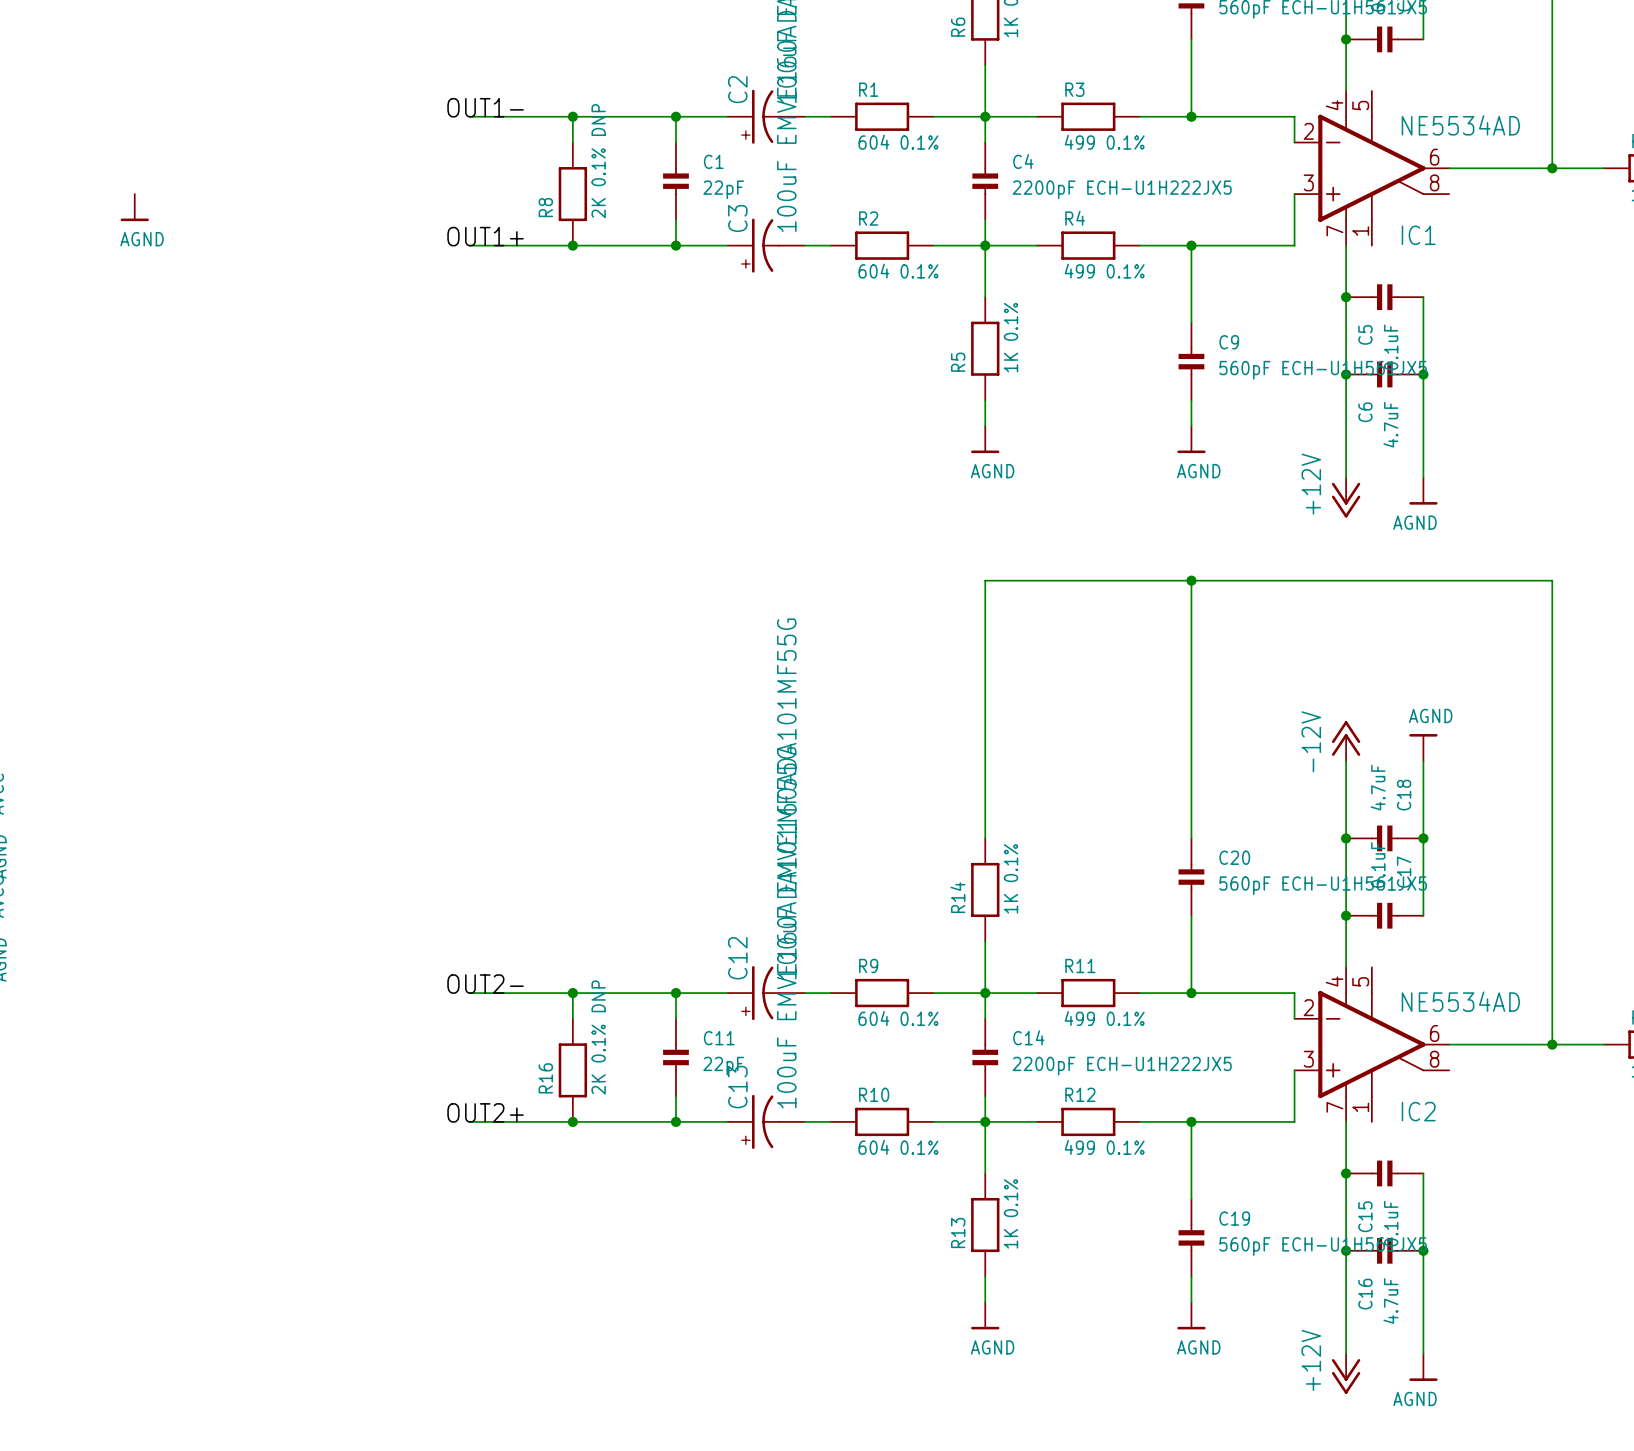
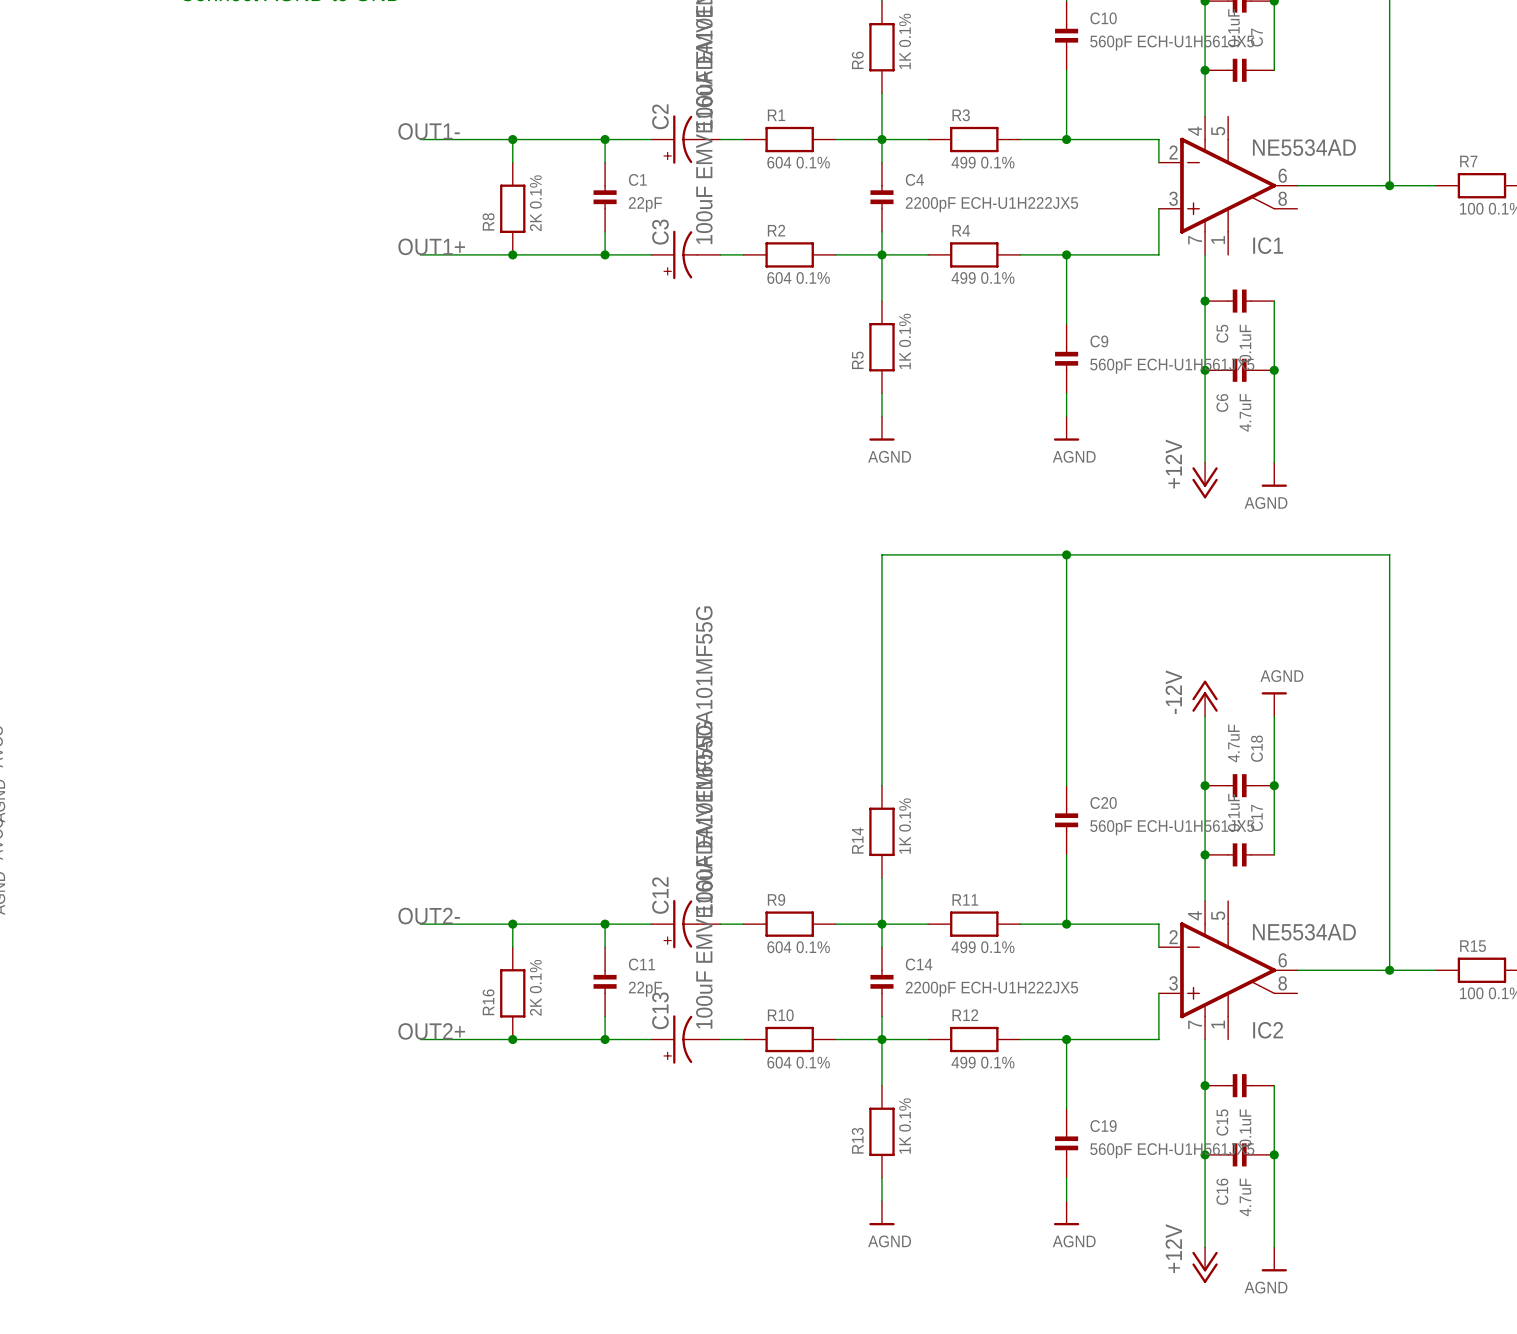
R8 value: 2K 0.1% DNP (598, 161) -> 2K 0.1% (535, 203)
power symbol: AGND (134, 207) -> none
R16 value: 2K 0.1% DNP (598, 1037) -> 2K 0.1% (535, 987)

